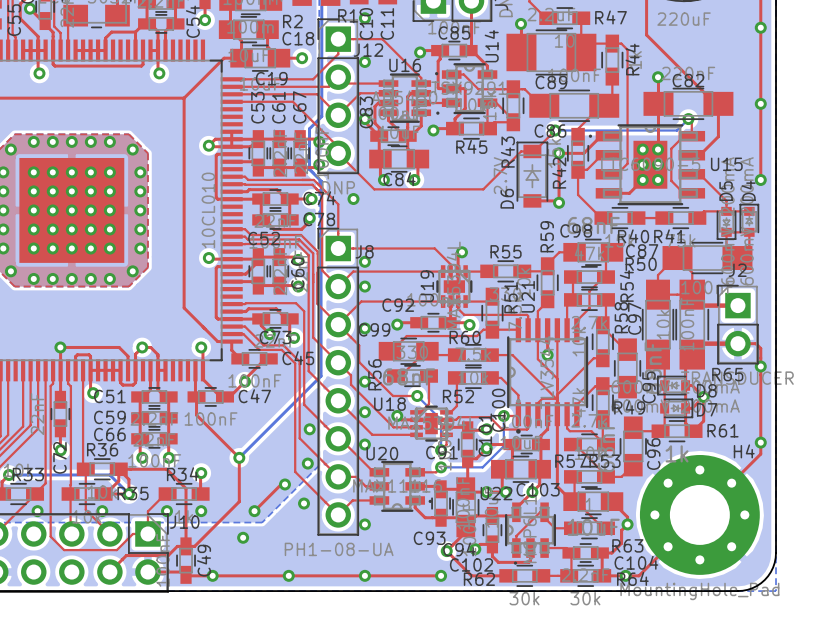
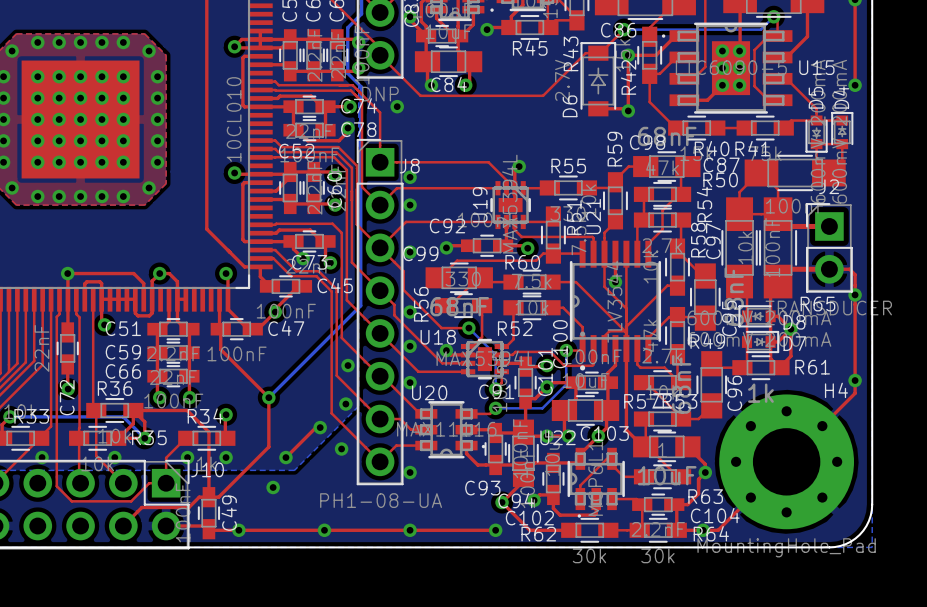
top track: none -> (17, 299) (17, 363) (8, 371)

